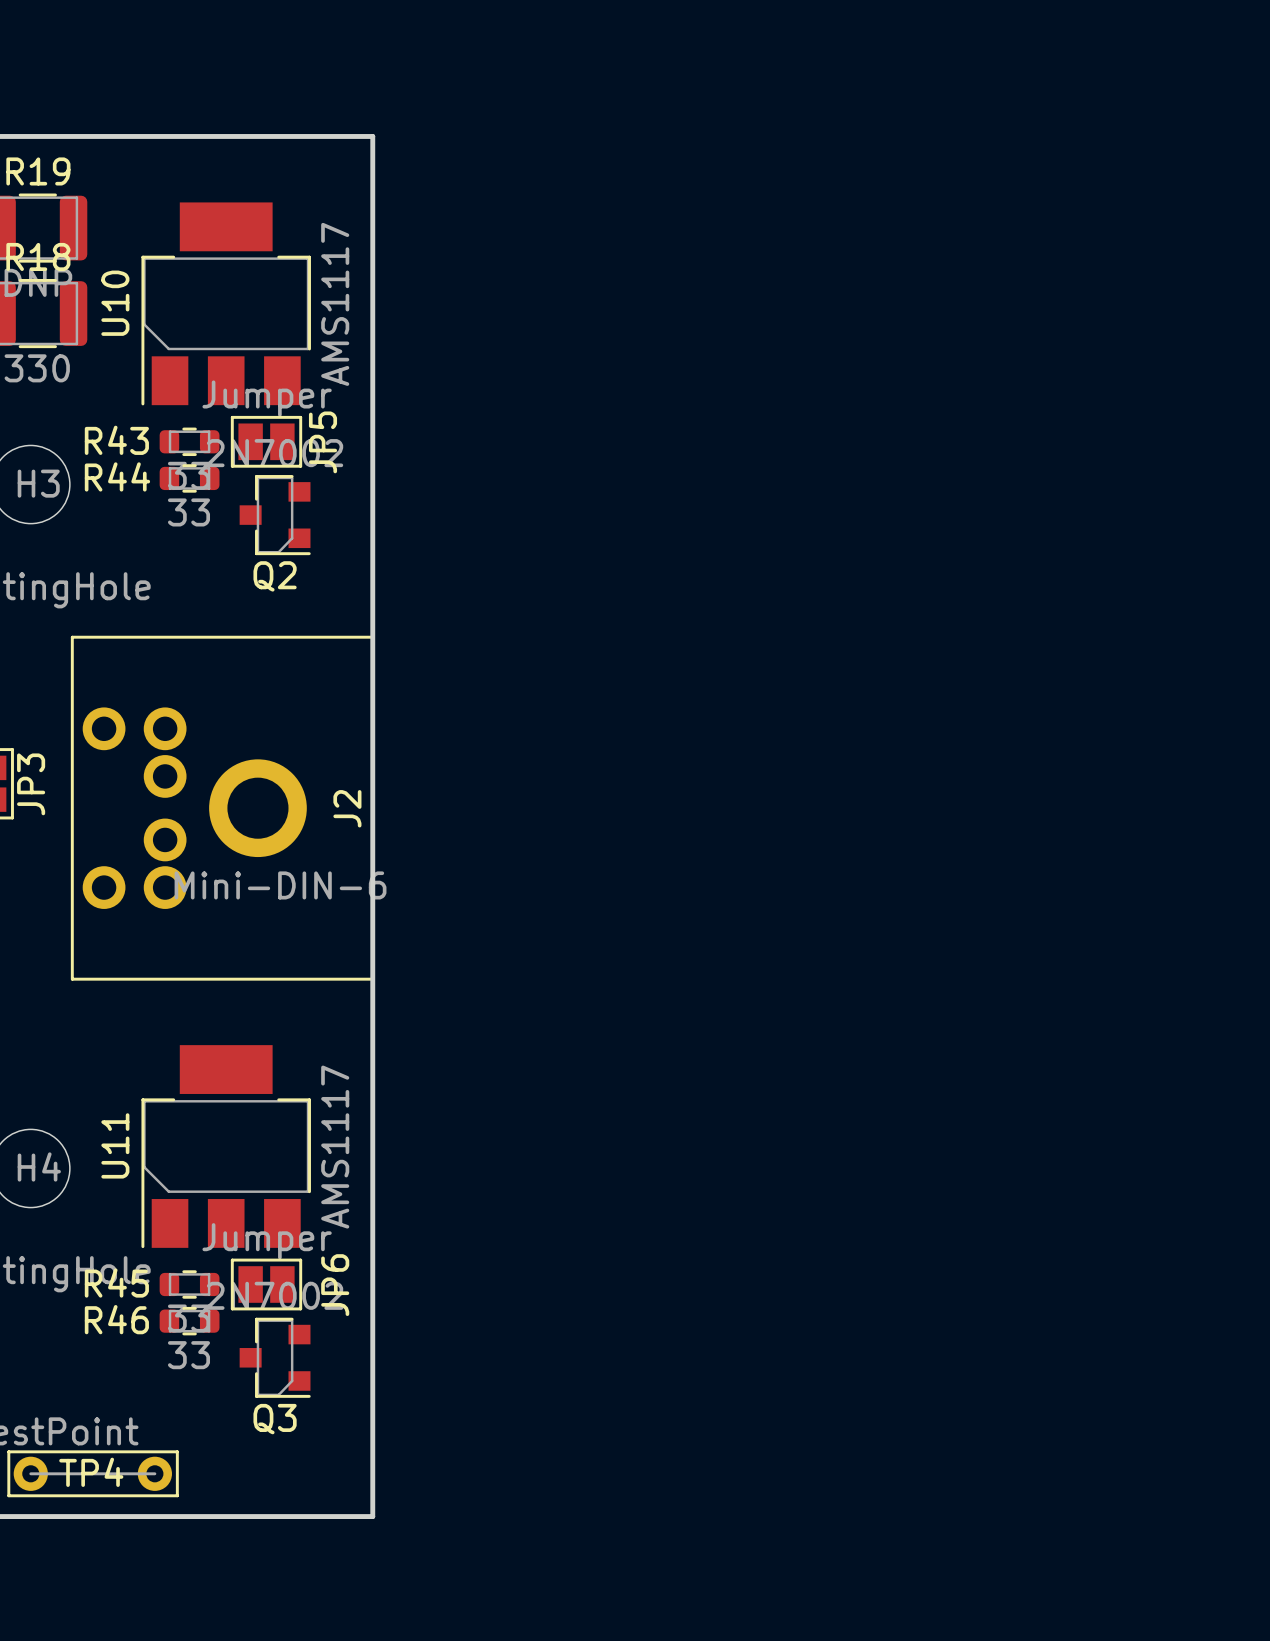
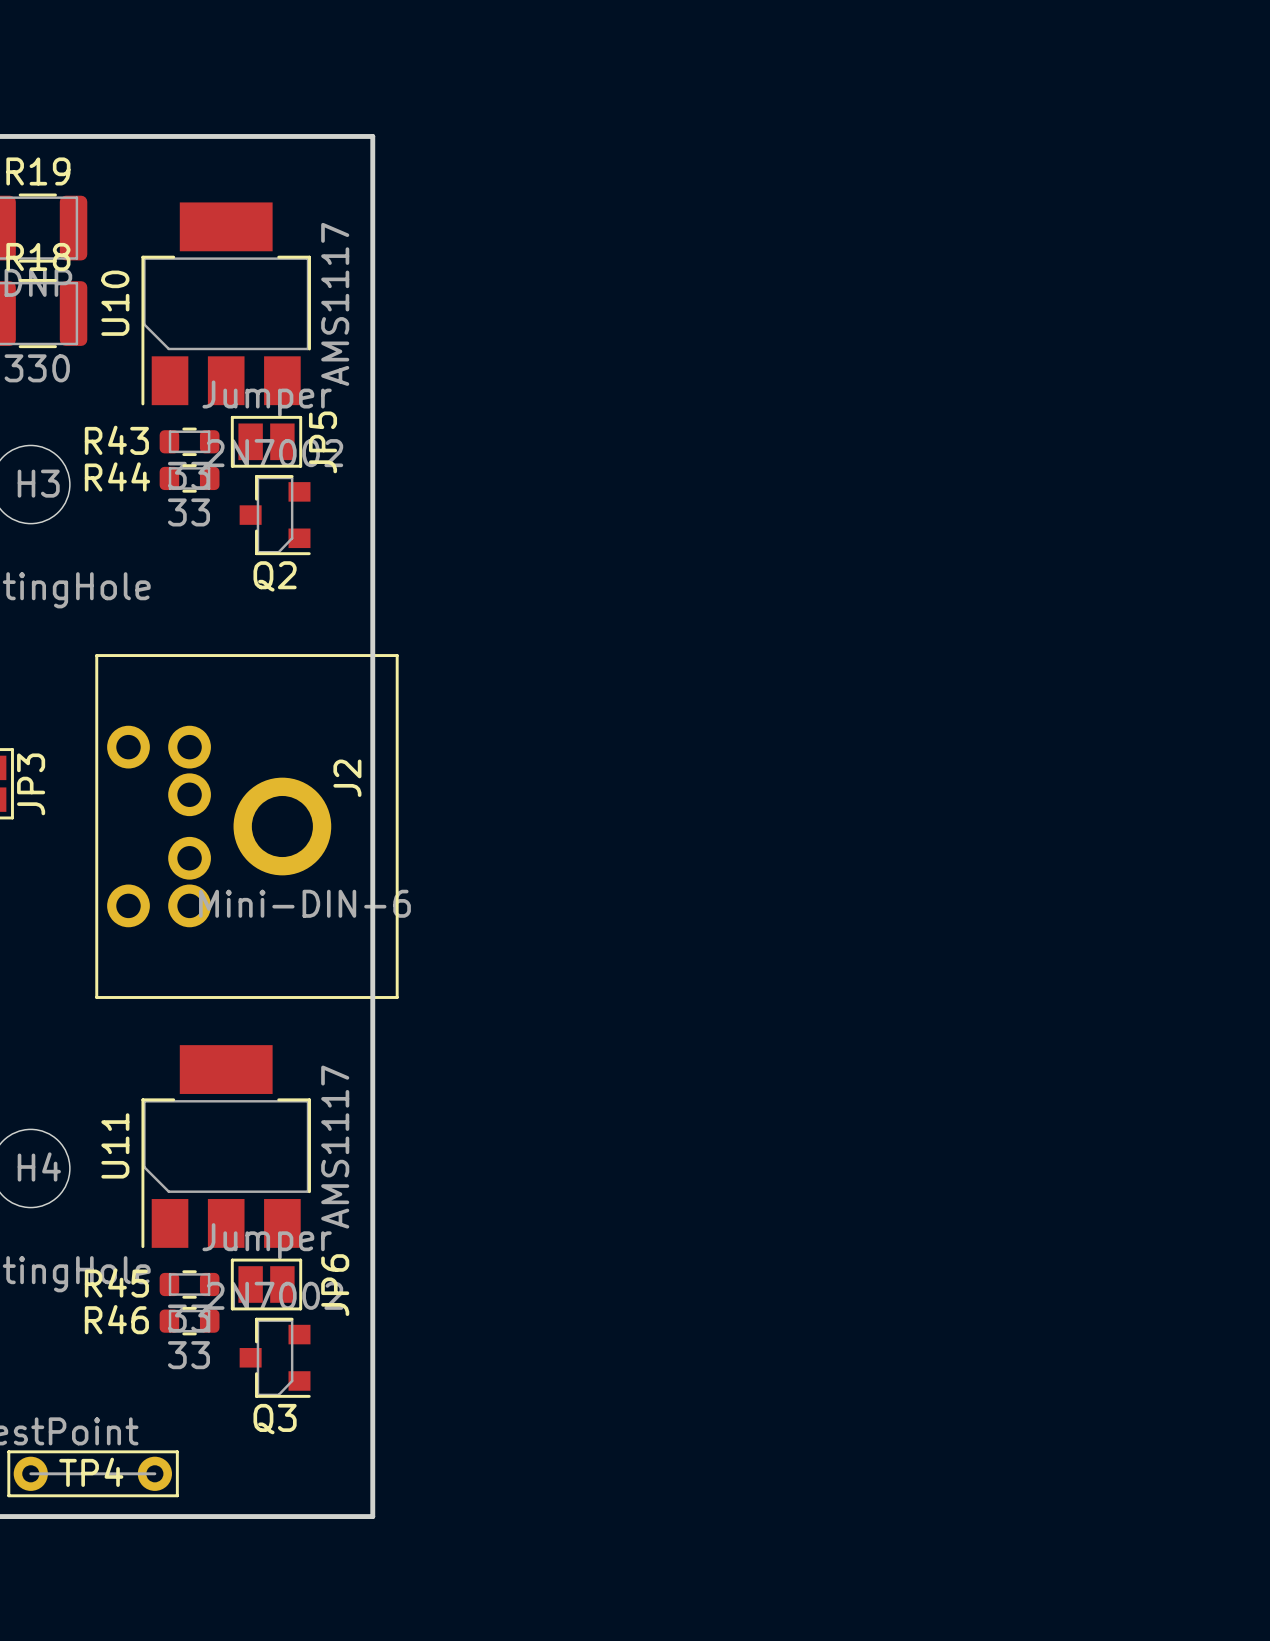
J2 position: (222, 808) -> (246, 826)
J2 name position: J2 (347, 808) -> J2 (347, 778)

